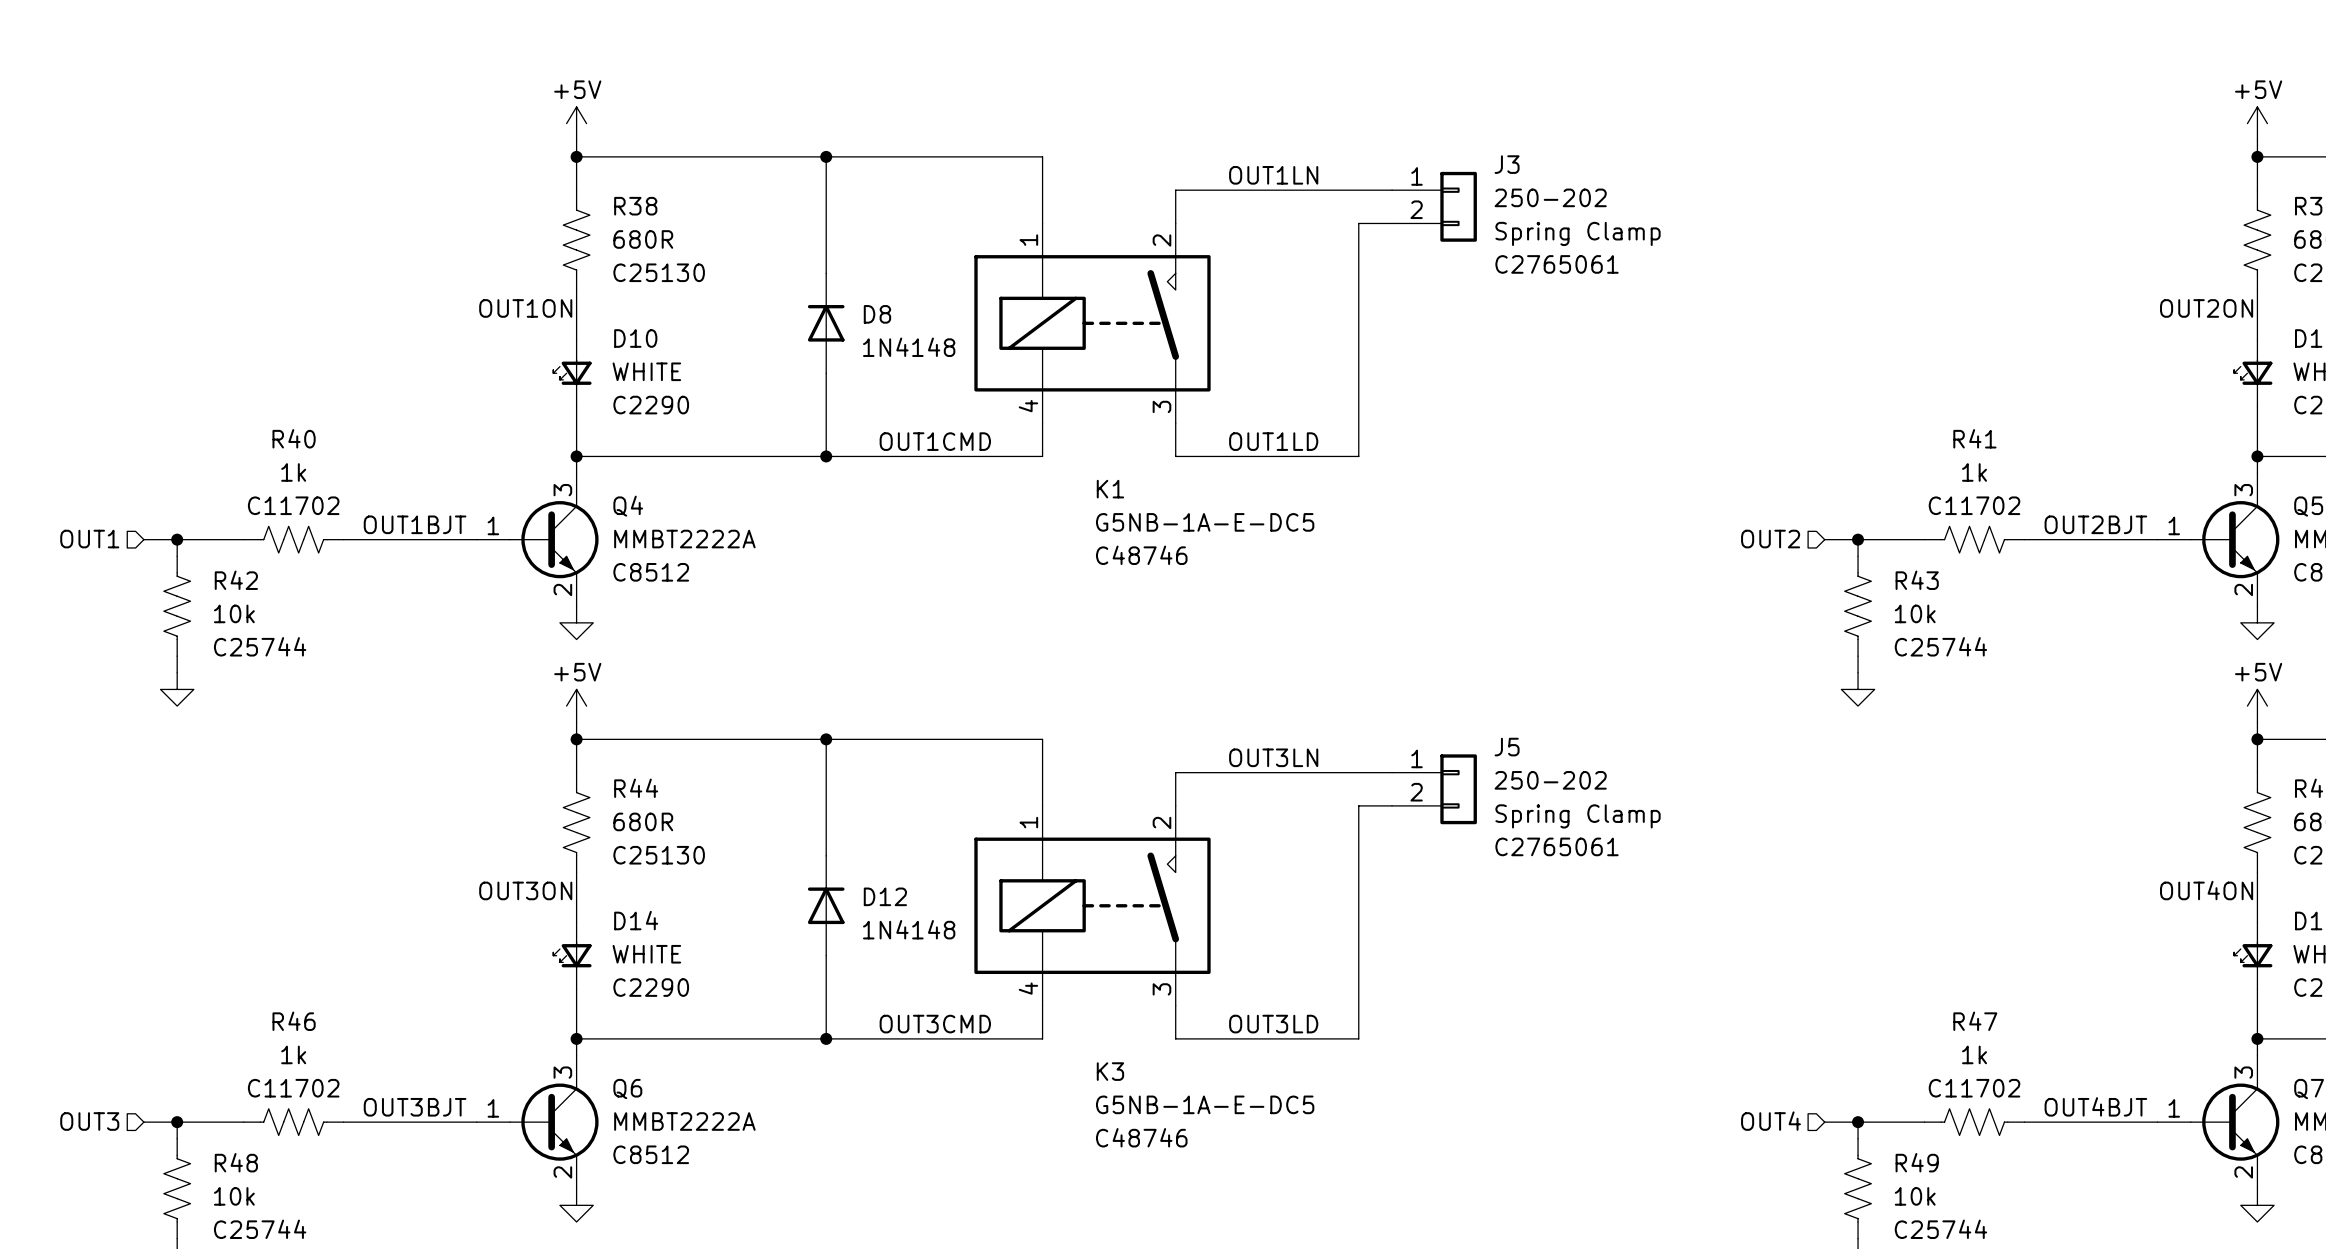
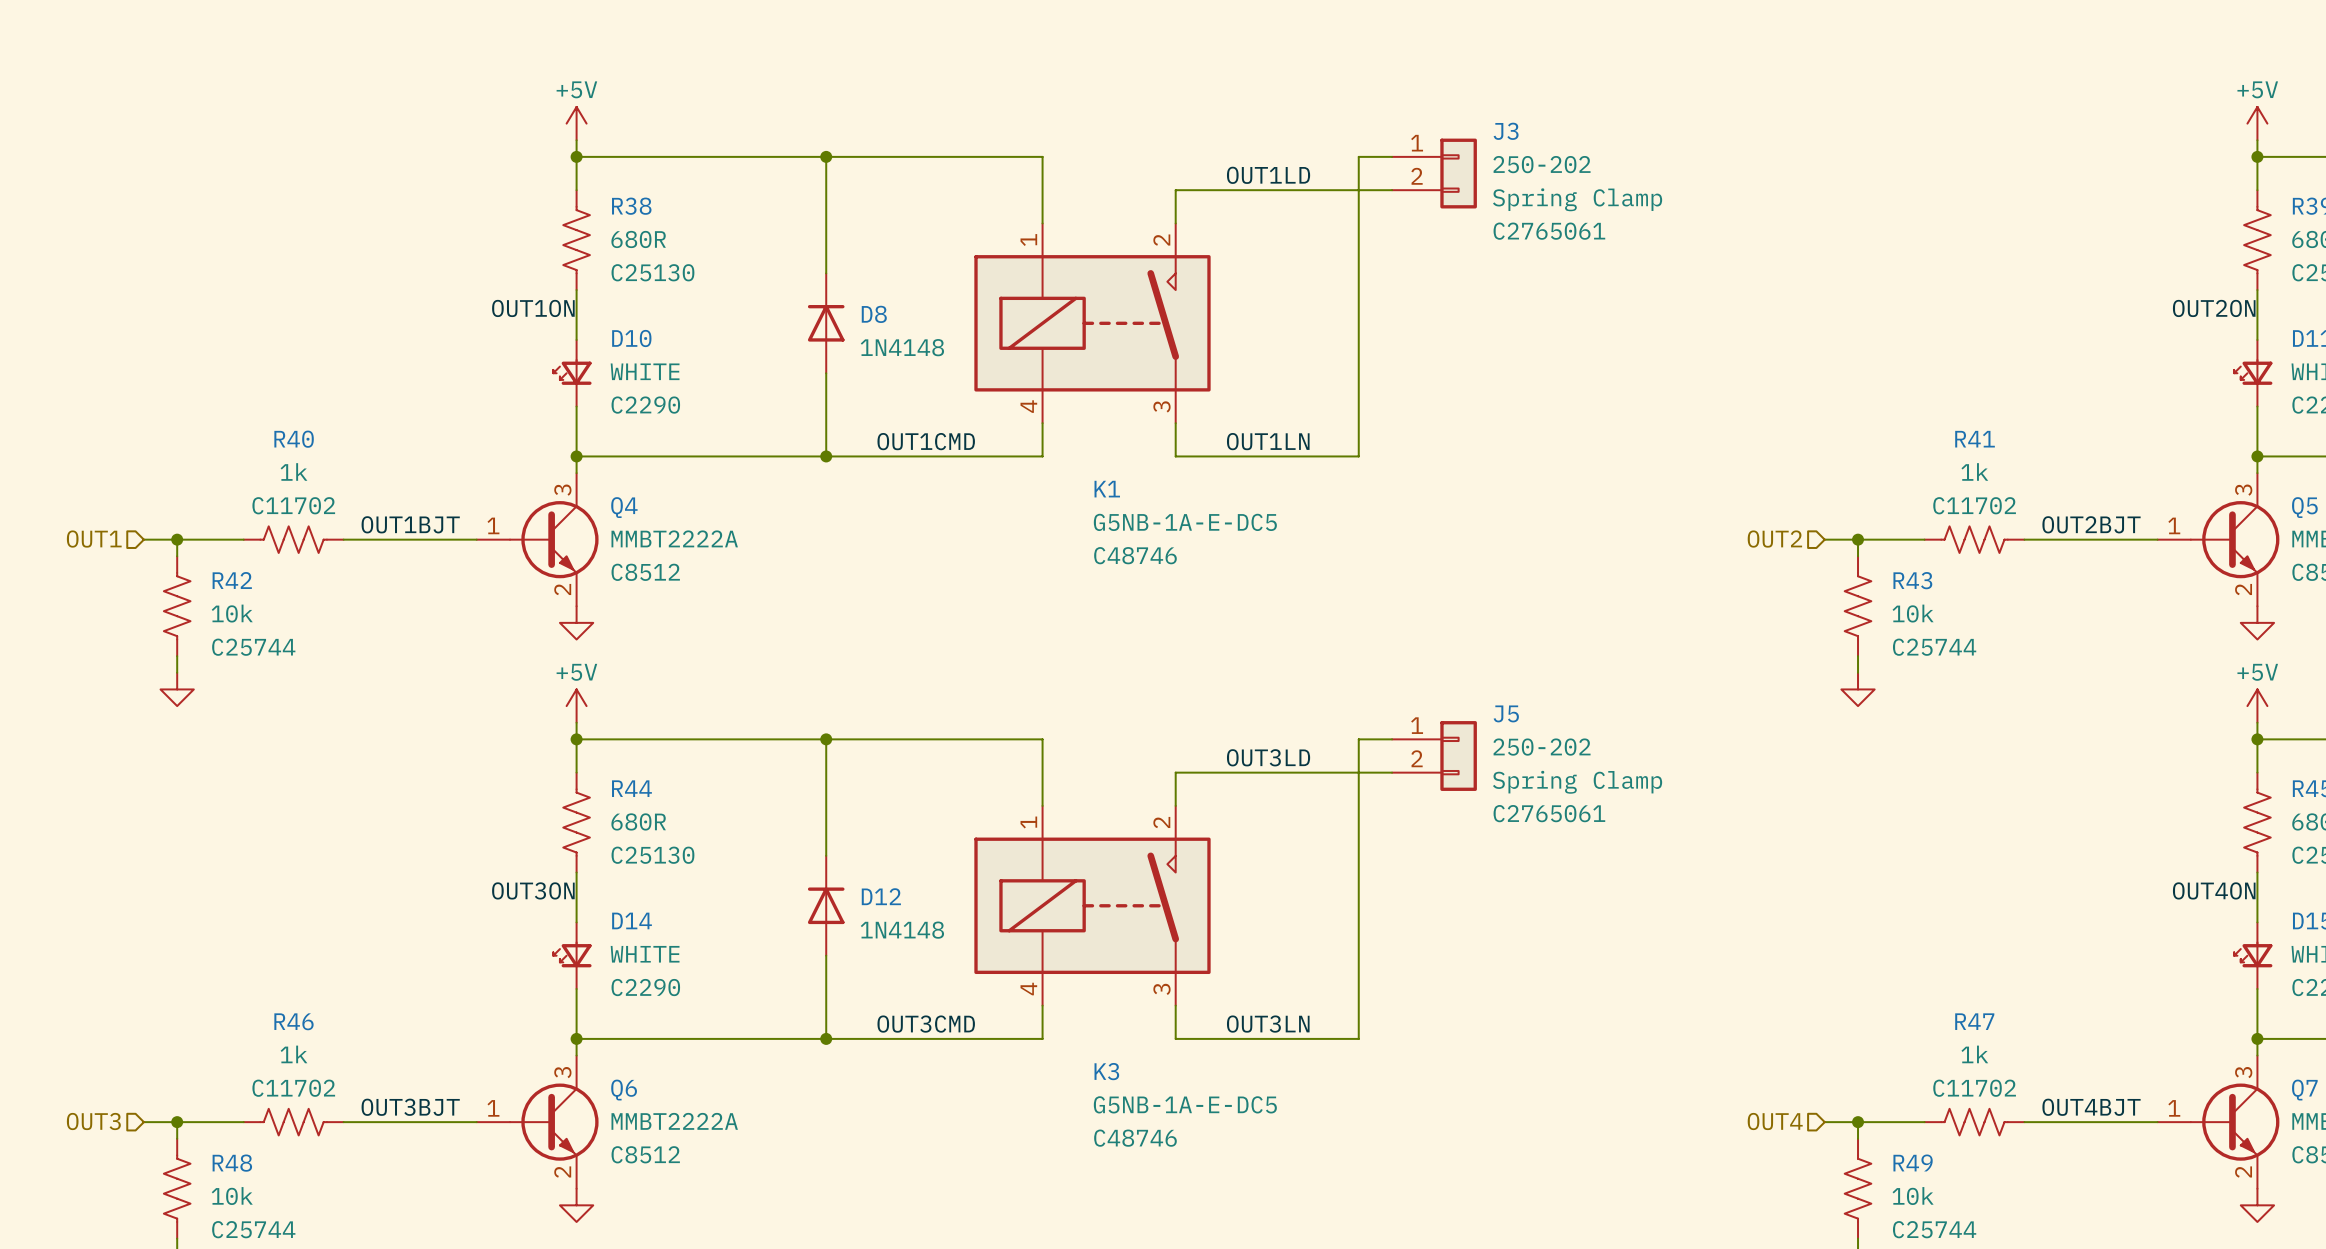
label: OUT1LN (1273, 175) -> OUT1LD (1268, 175)
J3 position: (1434, 206) -> (1434, 173)
wire: (1358, 223) (1392, 223) -> (1358, 223) (1358, 156) (1392, 156)
label: OUT1LD (1273, 441) -> OUT1LN (1268, 441)
label: OUT3LN (1273, 757) -> OUT3LD (1268, 757)
J5 position: (1434, 789) -> (1434, 756)
wire: (1358, 805) (1392, 805) -> (1358, 805) (1358, 739) (1392, 739)
label: OUT3LD (1273, 1024) -> OUT3LN (1268, 1024)

